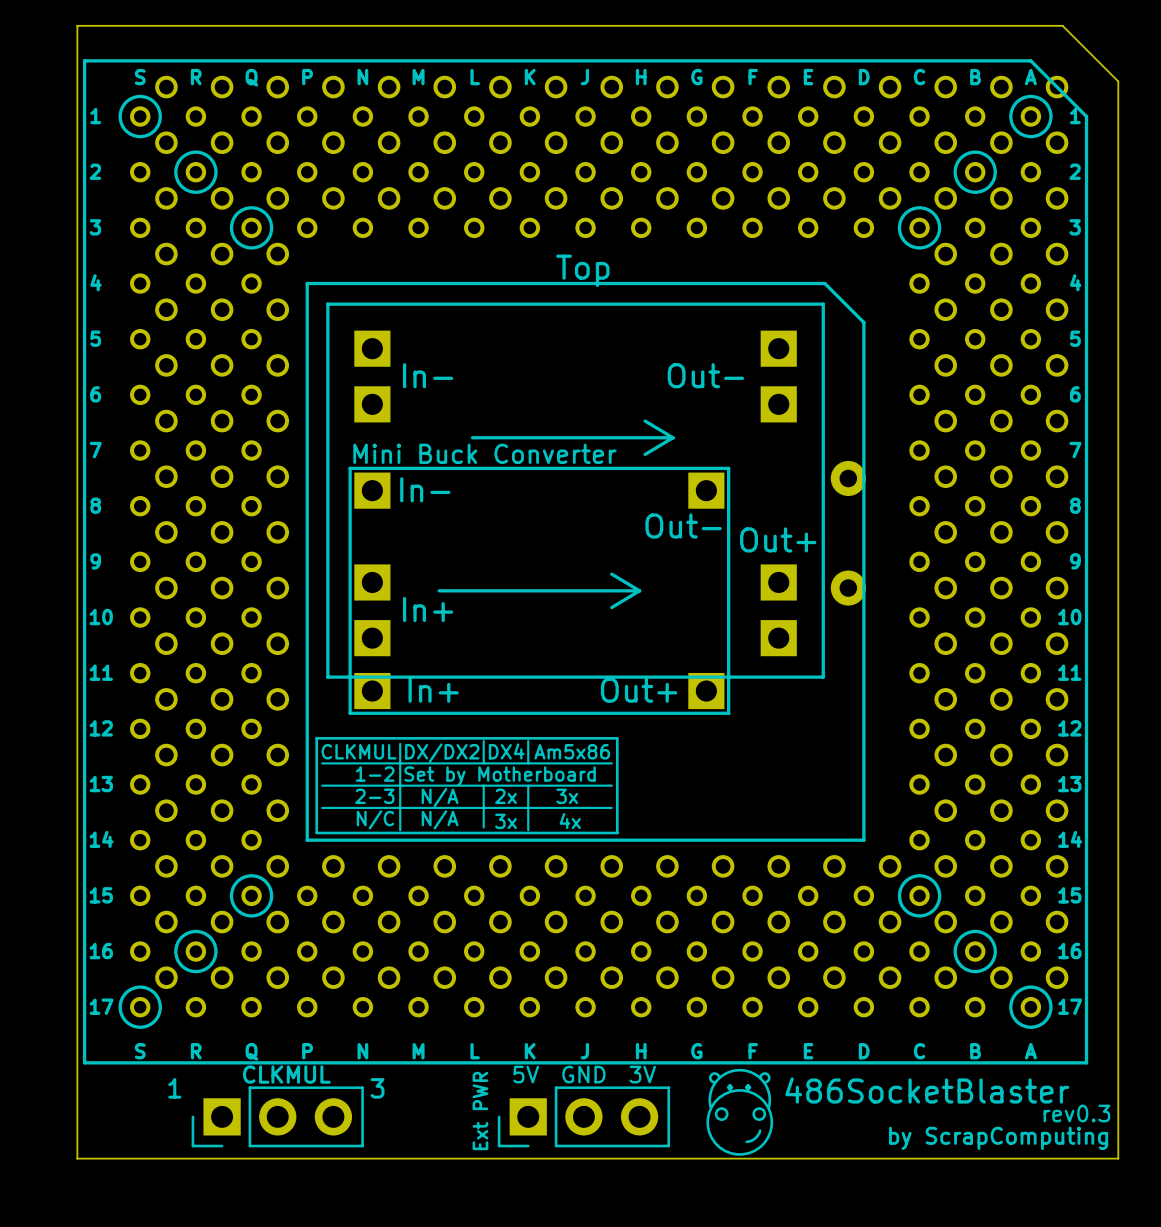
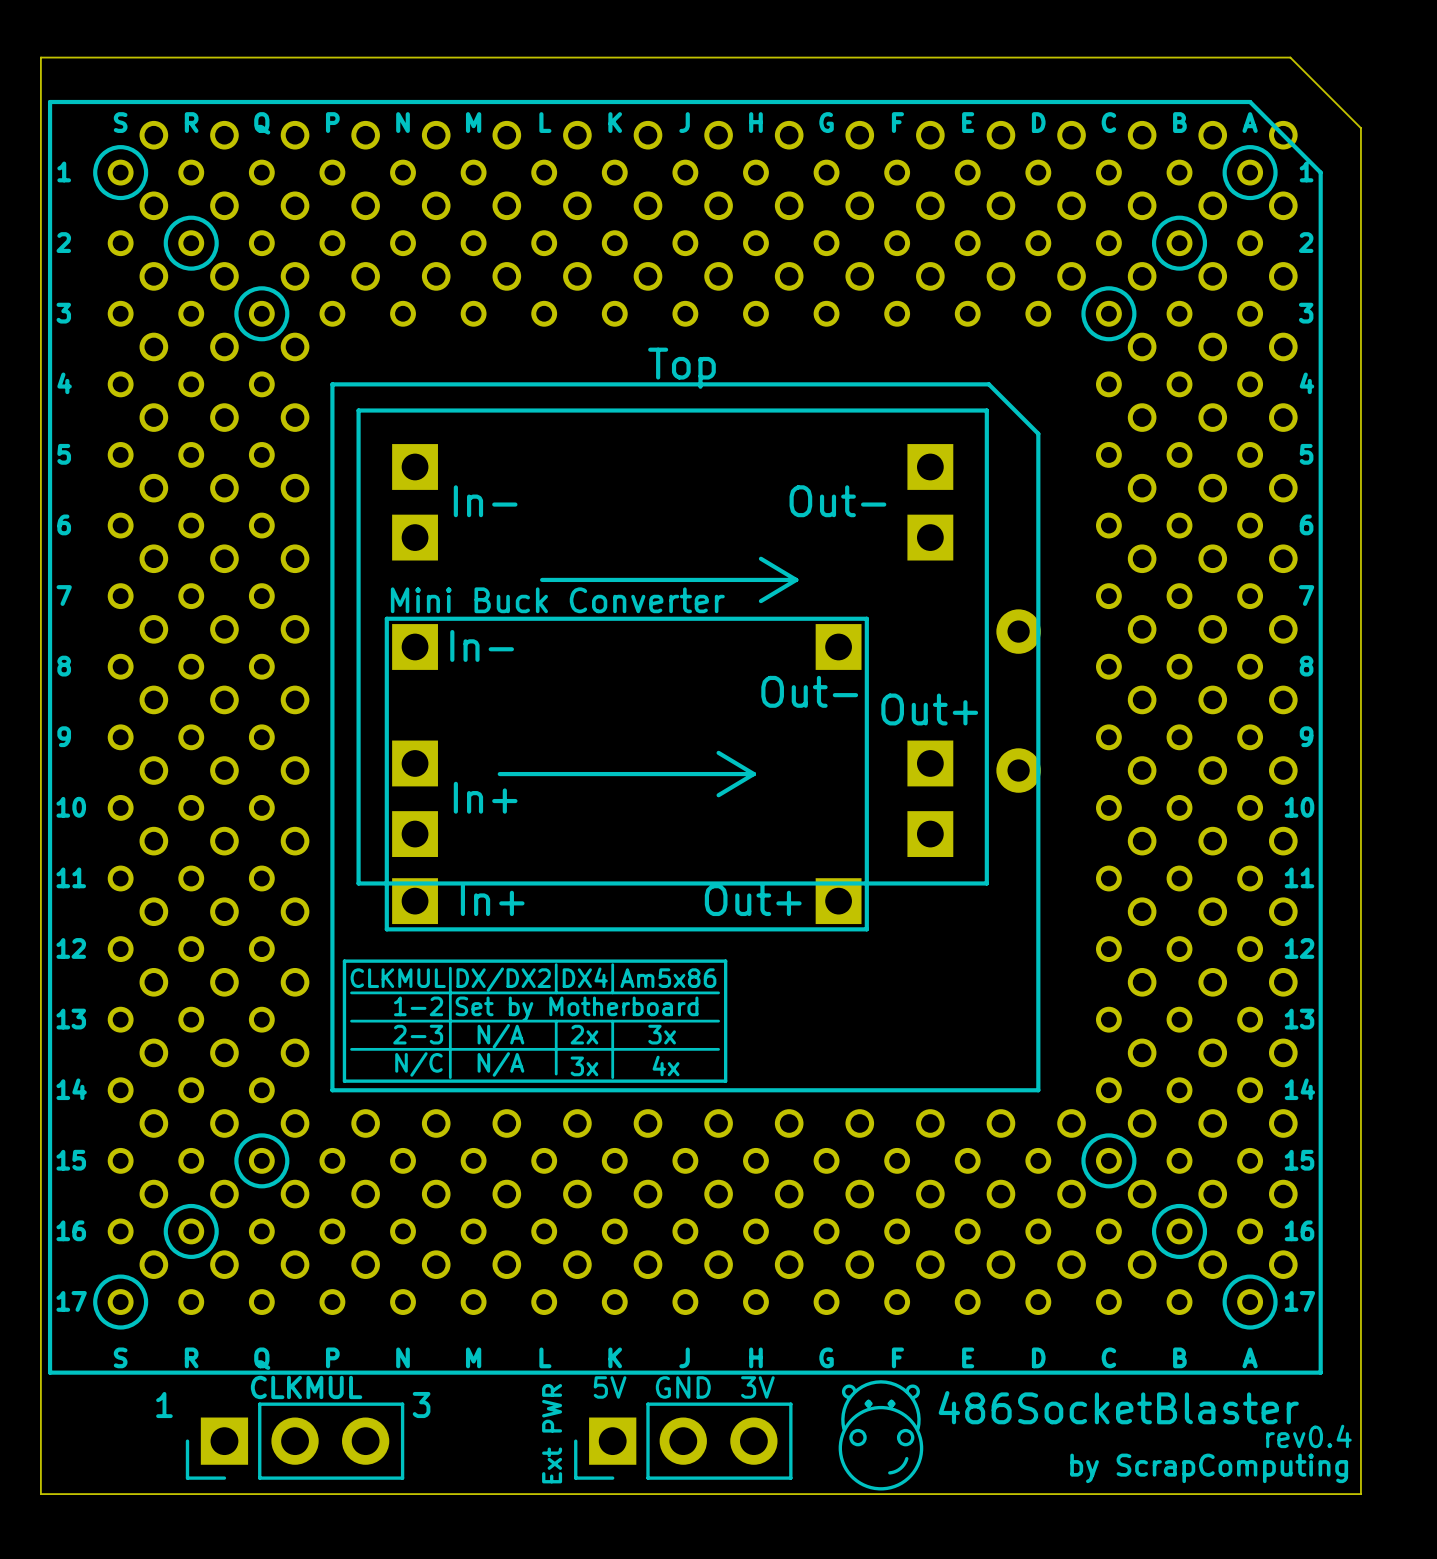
text: rev0.3 (1076, 1113) -> rev0.4 (1308, 1436)

